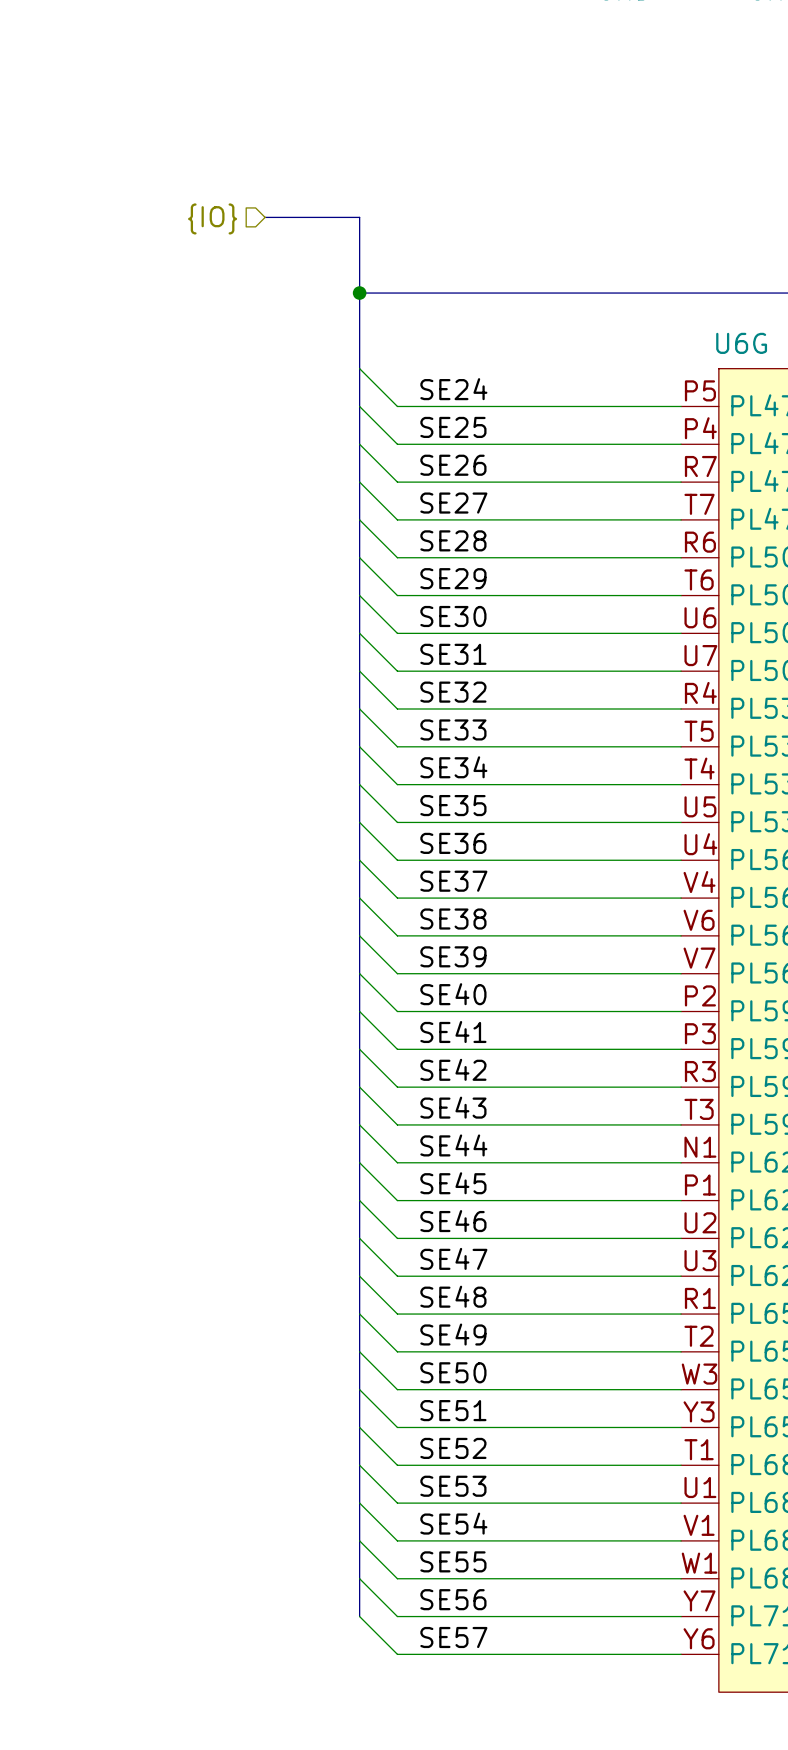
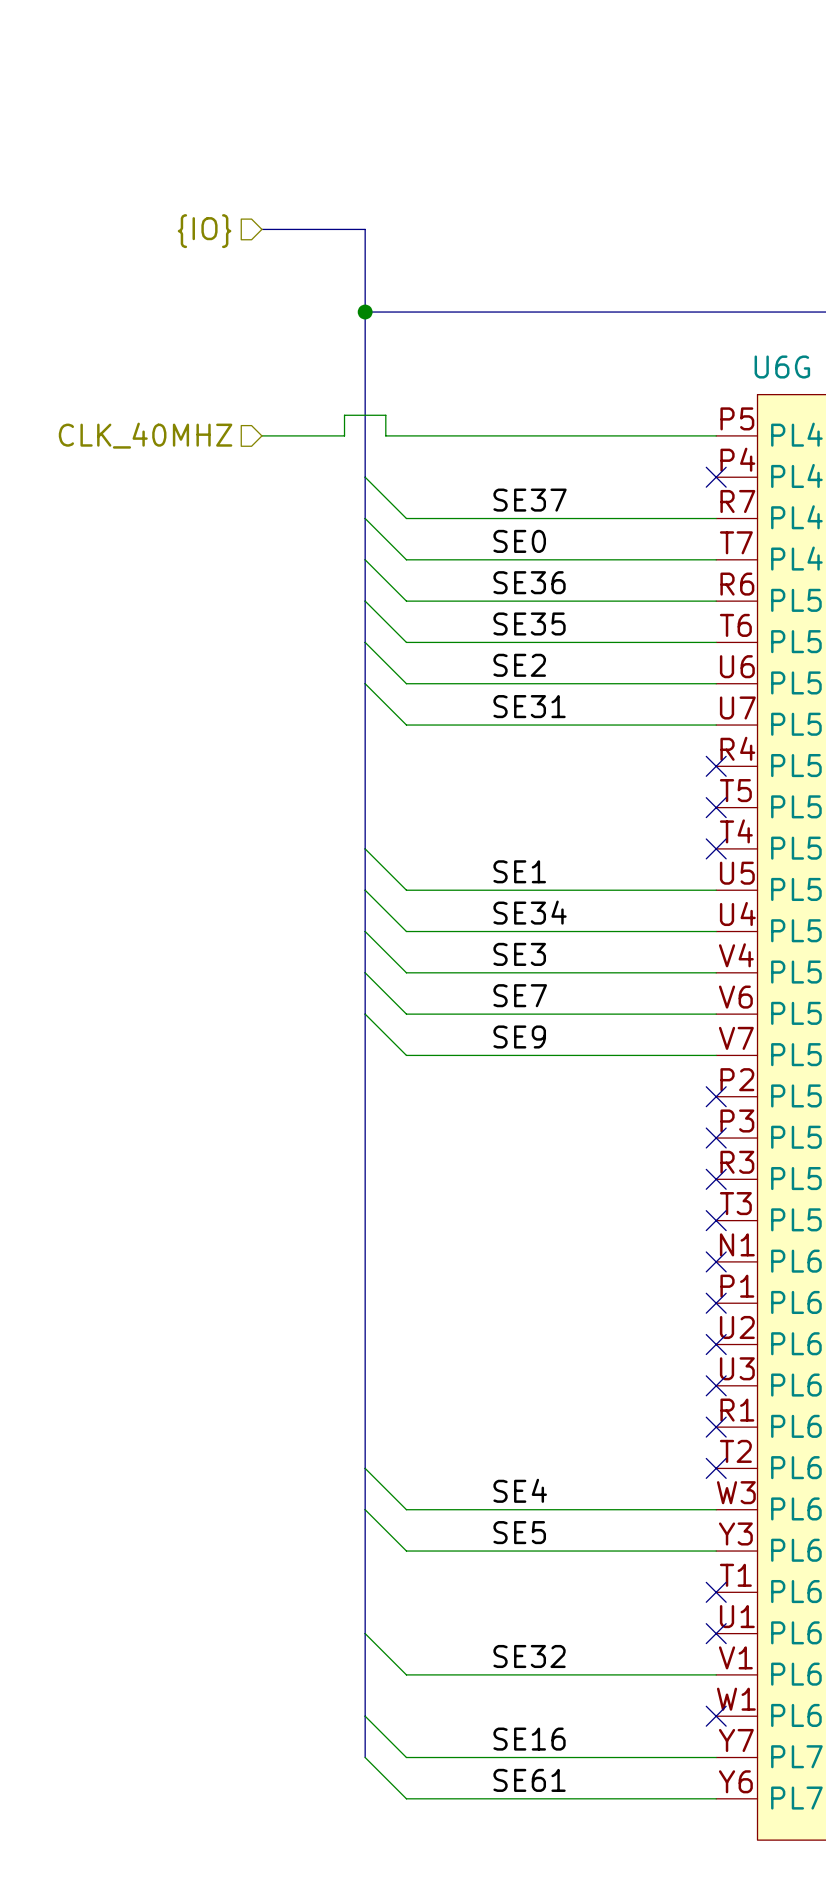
wire: (359, 368) (397, 406) -> (261, 435) (344, 435) (344, 415) (385, 415) (385, 435) (406, 435)
label: SE24 (453, 389) -> none
hierarchical label: none -> CLK_40MHZ (145, 435)
wire: (359, 406) (397, 444) (681, 444) -> none
label: SE25 (453, 427) -> none
no-connect mark: none -> (716, 477)
label: SE26 (453, 465) -> none
label: SE27 (453, 503) -> SE37 (530, 500)
label: none -> SE0 (519, 541)
label: SE28 (453, 540) -> none
label: SE29 (453, 578) -> SE2 (519, 665)
label: SE30 (453, 616) -> none
label position: SE31 (453, 654) -> SE31 (529, 706)
wire: (359, 671) (397, 709) (681, 709) -> none
label: SE32 (453, 692) -> none
wire: (359, 709) (397, 746) (681, 746) -> none
no-connect mark: none -> (716, 766)
label: SE33 (453, 729) -> none
wire: (359, 746) (397, 784) (681, 784) -> none
no-connect mark: none -> (716, 807)
label position: SE34 (453, 767) -> SE34 (530, 912)
no-connect mark: none -> (716, 848)
label position: SE35 (453, 805) -> SE35 (529, 623)
label: none -> SE1 (519, 871)
label position: SE36 (453, 843) -> SE36 (529, 582)
label: SE37 (453, 881) -> none
label: none -> SE3 (519, 954)
label: SE38 (453, 919) -> none
label: none -> SE7 (520, 995)
label: SE39 (453, 956) -> SE9 (519, 1036)
wire: (359, 973) (397, 1011) (681, 1011) -> none
label: SE40 (453, 994) -> none
wire: (359, 1011) (397, 1049) (681, 1049) -> none
no-connect mark: none -> (716, 1096)
label: SE41 (453, 1032) -> none
wire: (359, 1049) (397, 1087) (681, 1087) -> none
no-connect mark: none -> (716, 1138)
label: SE42 (453, 1069) -> none
wire: (359, 1087) (397, 1124) (681, 1124) -> none
no-connect mark: none -> (716, 1179)
label: SE43 (453, 1107) -> none
wire: (359, 1124) (397, 1162) (681, 1162) -> none
no-connect mark: none -> (716, 1220)
label: SE44 (453, 1145) -> none
wire: (359, 1162) (397, 1200) (681, 1200) -> none
no-connect mark: none -> (716, 1261)
label: SE45 (453, 1183) -> none
wire: (359, 1200) (397, 1238) (681, 1238) -> none
no-connect mark: none -> (716, 1303)
label: SE46 (453, 1221) -> none
wire: (359, 1238) (397, 1276) (681, 1276) -> none
no-connect mark: none -> (716, 1344)
label: SE47 (453, 1258) -> none
wire: (359, 1276) (397, 1314) (681, 1314) -> none
no-connect mark: none -> (716, 1385)
label: SE48 (453, 1296) -> none
wire: (359, 1314) (397, 1351) (681, 1351) -> none
no-connect mark: none -> (716, 1427)
label: SE49 (453, 1334) -> SE4 (520, 1490)
no-connect mark: none -> (716, 1468)
label: SE50 (453, 1372) -> none
label: SE51 (453, 1410) -> none
label: none -> SE5 (519, 1532)
wire: (359, 1427) (397, 1465) (681, 1465) -> none
label: SE52 (453, 1448) -> none
wire: (359, 1465) (397, 1503) (681, 1503) -> none
no-connect mark: none -> (716, 1592)
label: SE53 (453, 1486) -> SE32 (529, 1656)
no-connect mark: none -> (716, 1633)
label: SE54 (453, 1523) -> none
wire: (359, 1540) (397, 1578) (681, 1578) -> none
label: SE55 (453, 1561) -> none
no-connect mark: none -> (716, 1716)
label: SE56 (453, 1599) -> none
label: none -> SE16 (529, 1739)
label: SE57 (453, 1637) -> none
label: none -> SE61 (529, 1780)

